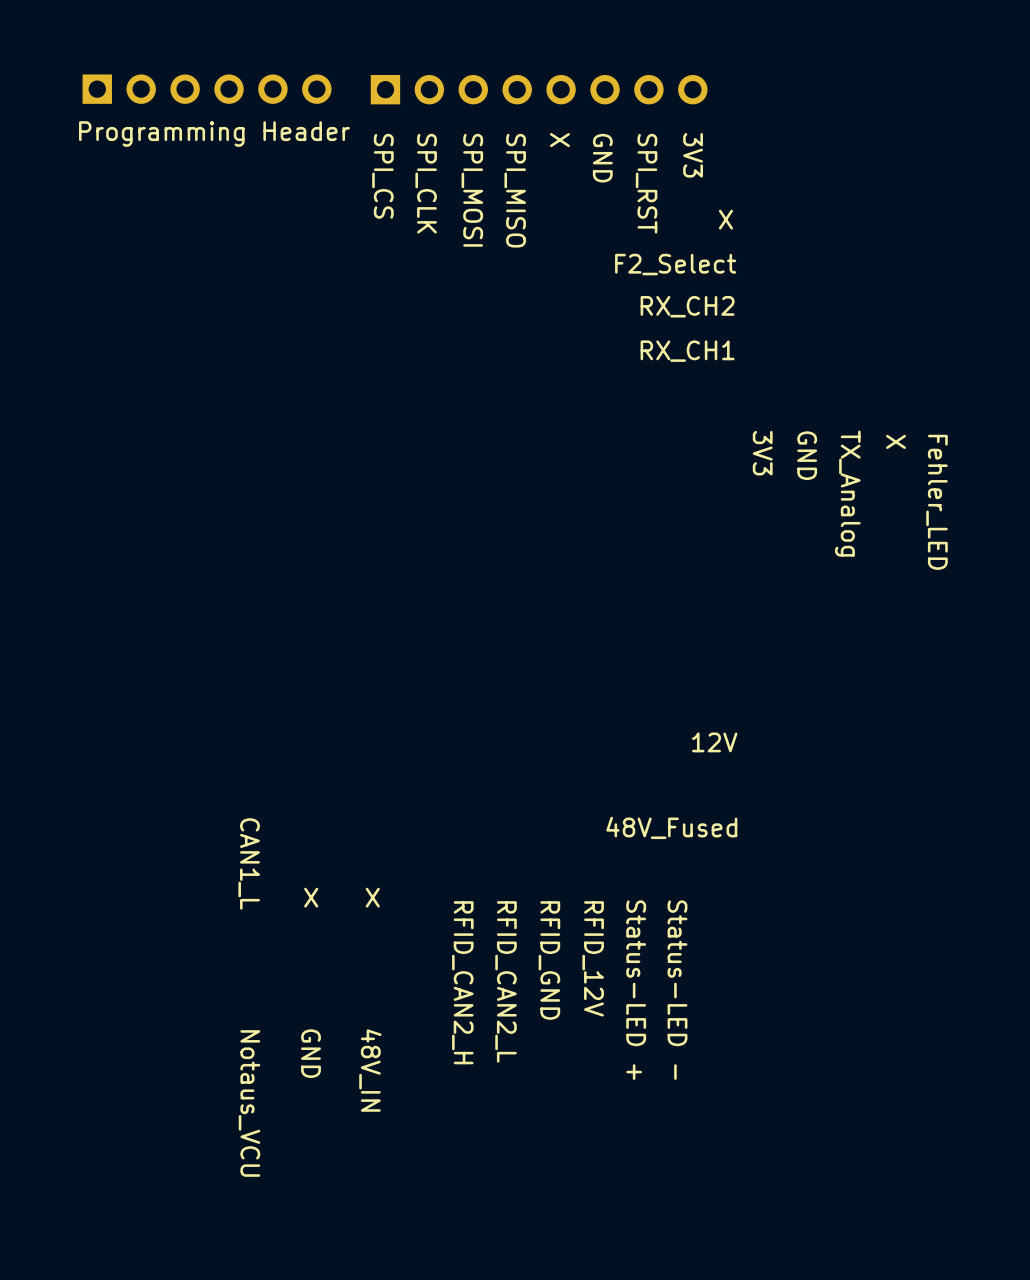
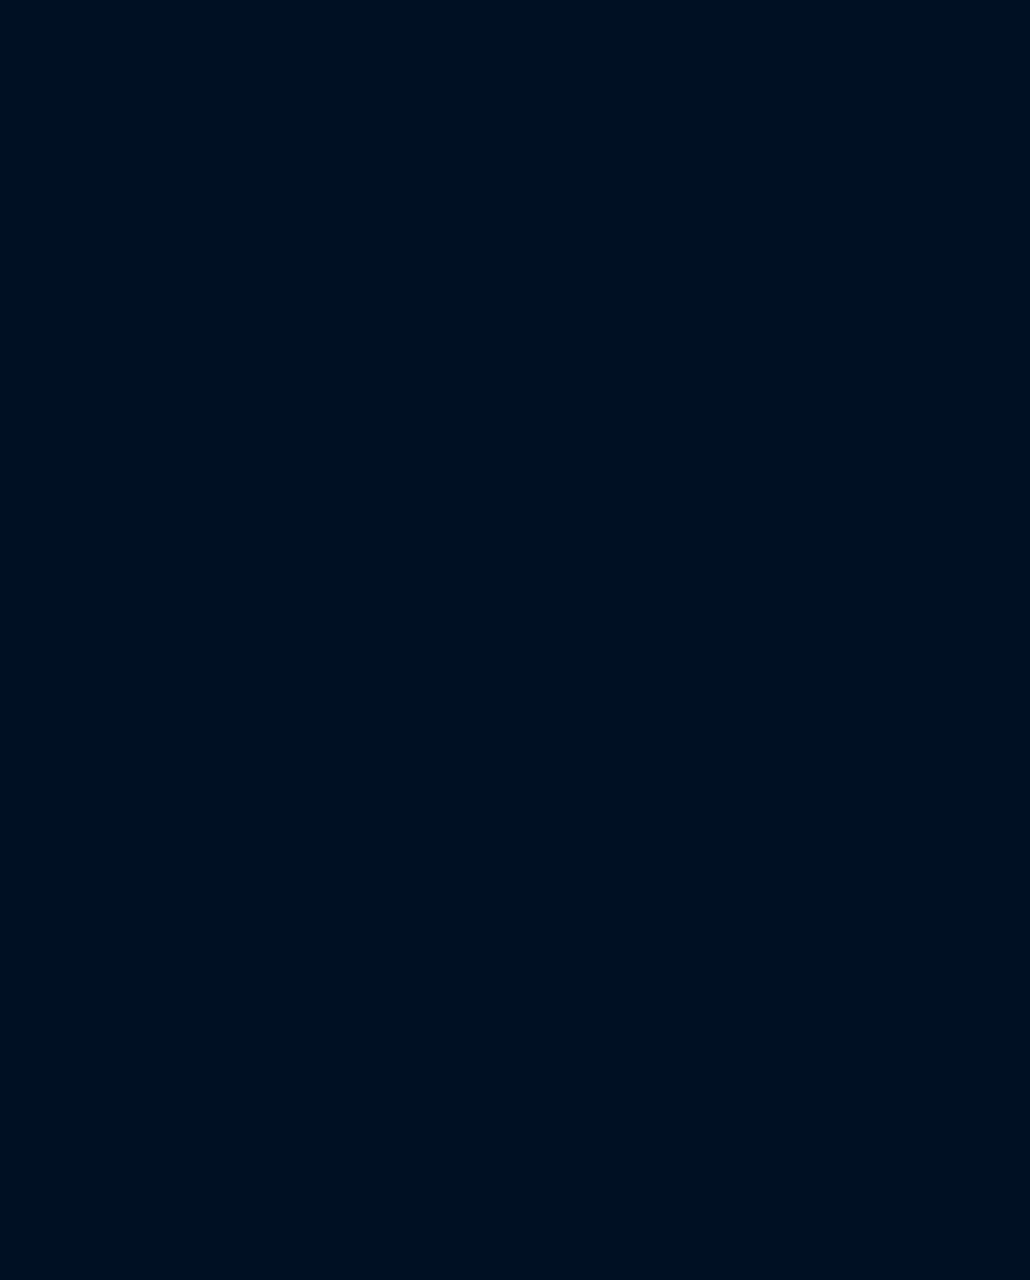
part: (207, 89) -> none
part: (539, 89) -> none
text: Programming Header (214, 134) -> none
text: X (559, 140) -> none
text: 3V3 (693, 155) -> none
text: GND (602, 158) -> none
text: SPI_CS (382, 176) -> none
text: SPI_CLK (426, 183) -> none
text: SPI_RST (646, 183) -> none
text: SPI_MOSI (472, 190) -> none
text: SPI_MISO (515, 190) -> none
text: X (725, 219) -> none
text: F2_Select (675, 264) -> none
text: RX_CH2 (687, 306) -> none
text: RX_CH1 (687, 351) -> none
text: X (896, 441) -> none
text: 3V3 (762, 453) -> none
text: GND (807, 455) -> none
text: TX_Analog (847, 493) -> none
text: Fehler_LED (937, 502) -> none
text: 12V (714, 742) -> none
text: 48V_Fused (671, 827) -> none
text: CAN1_L (249, 863) -> none
text: X (311, 897) -> none
text: X (372, 897) -> none
text: RFID_12V (593, 958) -> none
text: RFID_GND (549, 960) -> none
text: RFID_CAN2_L (506, 981) -> none
text: RFID_CAN2_H (462, 982) -> none
text: Status-LED + (636, 990) -> none
text: Status-LED - (677, 990) -> none
text: GND (310, 1053) -> none
text: 48V_IN (370, 1070) -> none
text: Notaus_VCU (249, 1103) -> none

